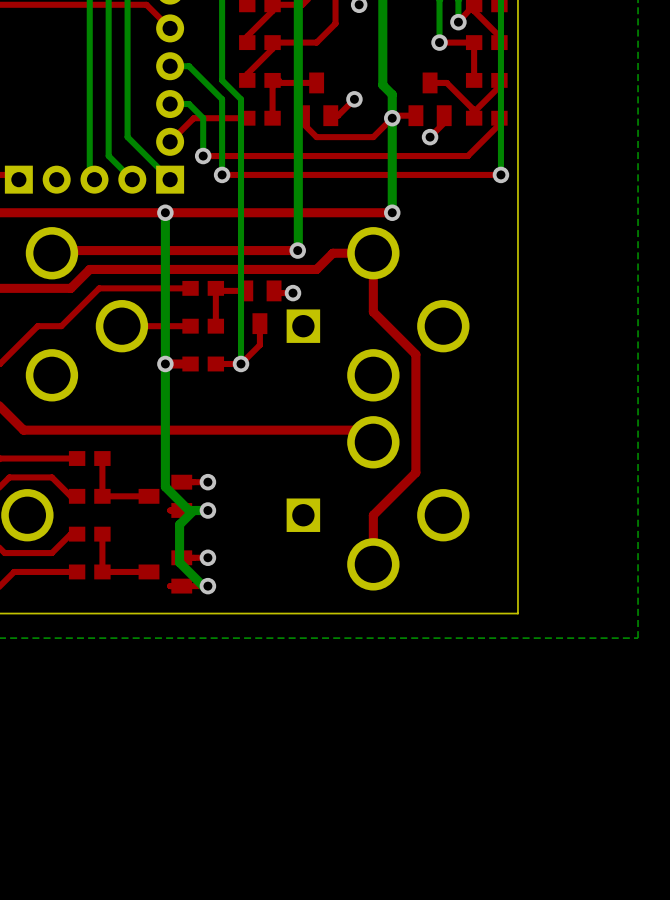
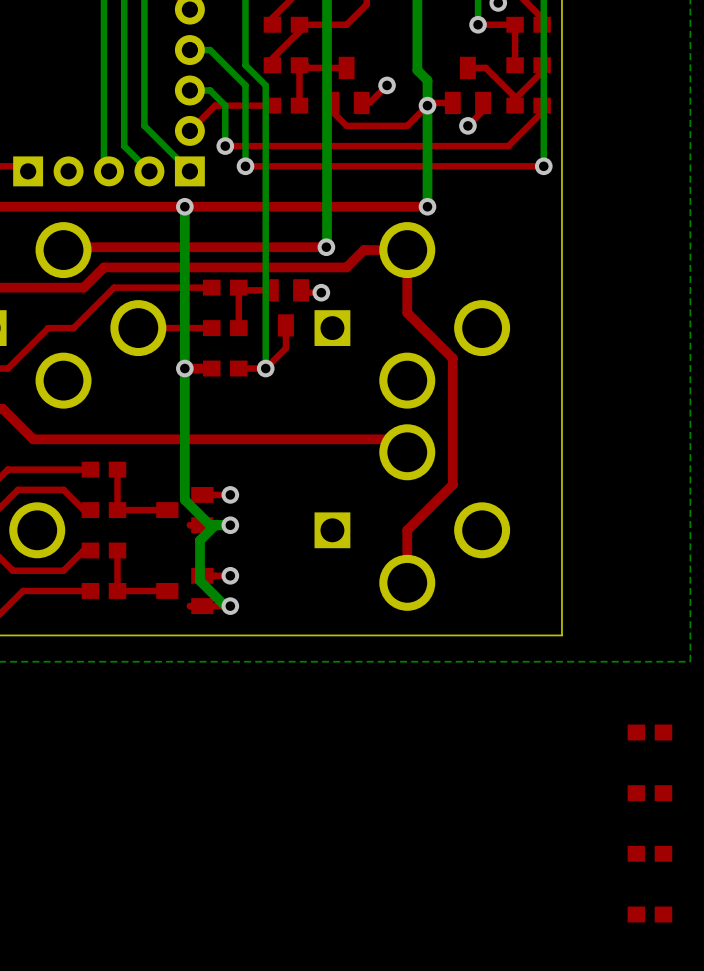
part: none -> (649, 732)
part: none -> (649, 793)
part: none -> (649, 853)
part: none -> (649, 914)

